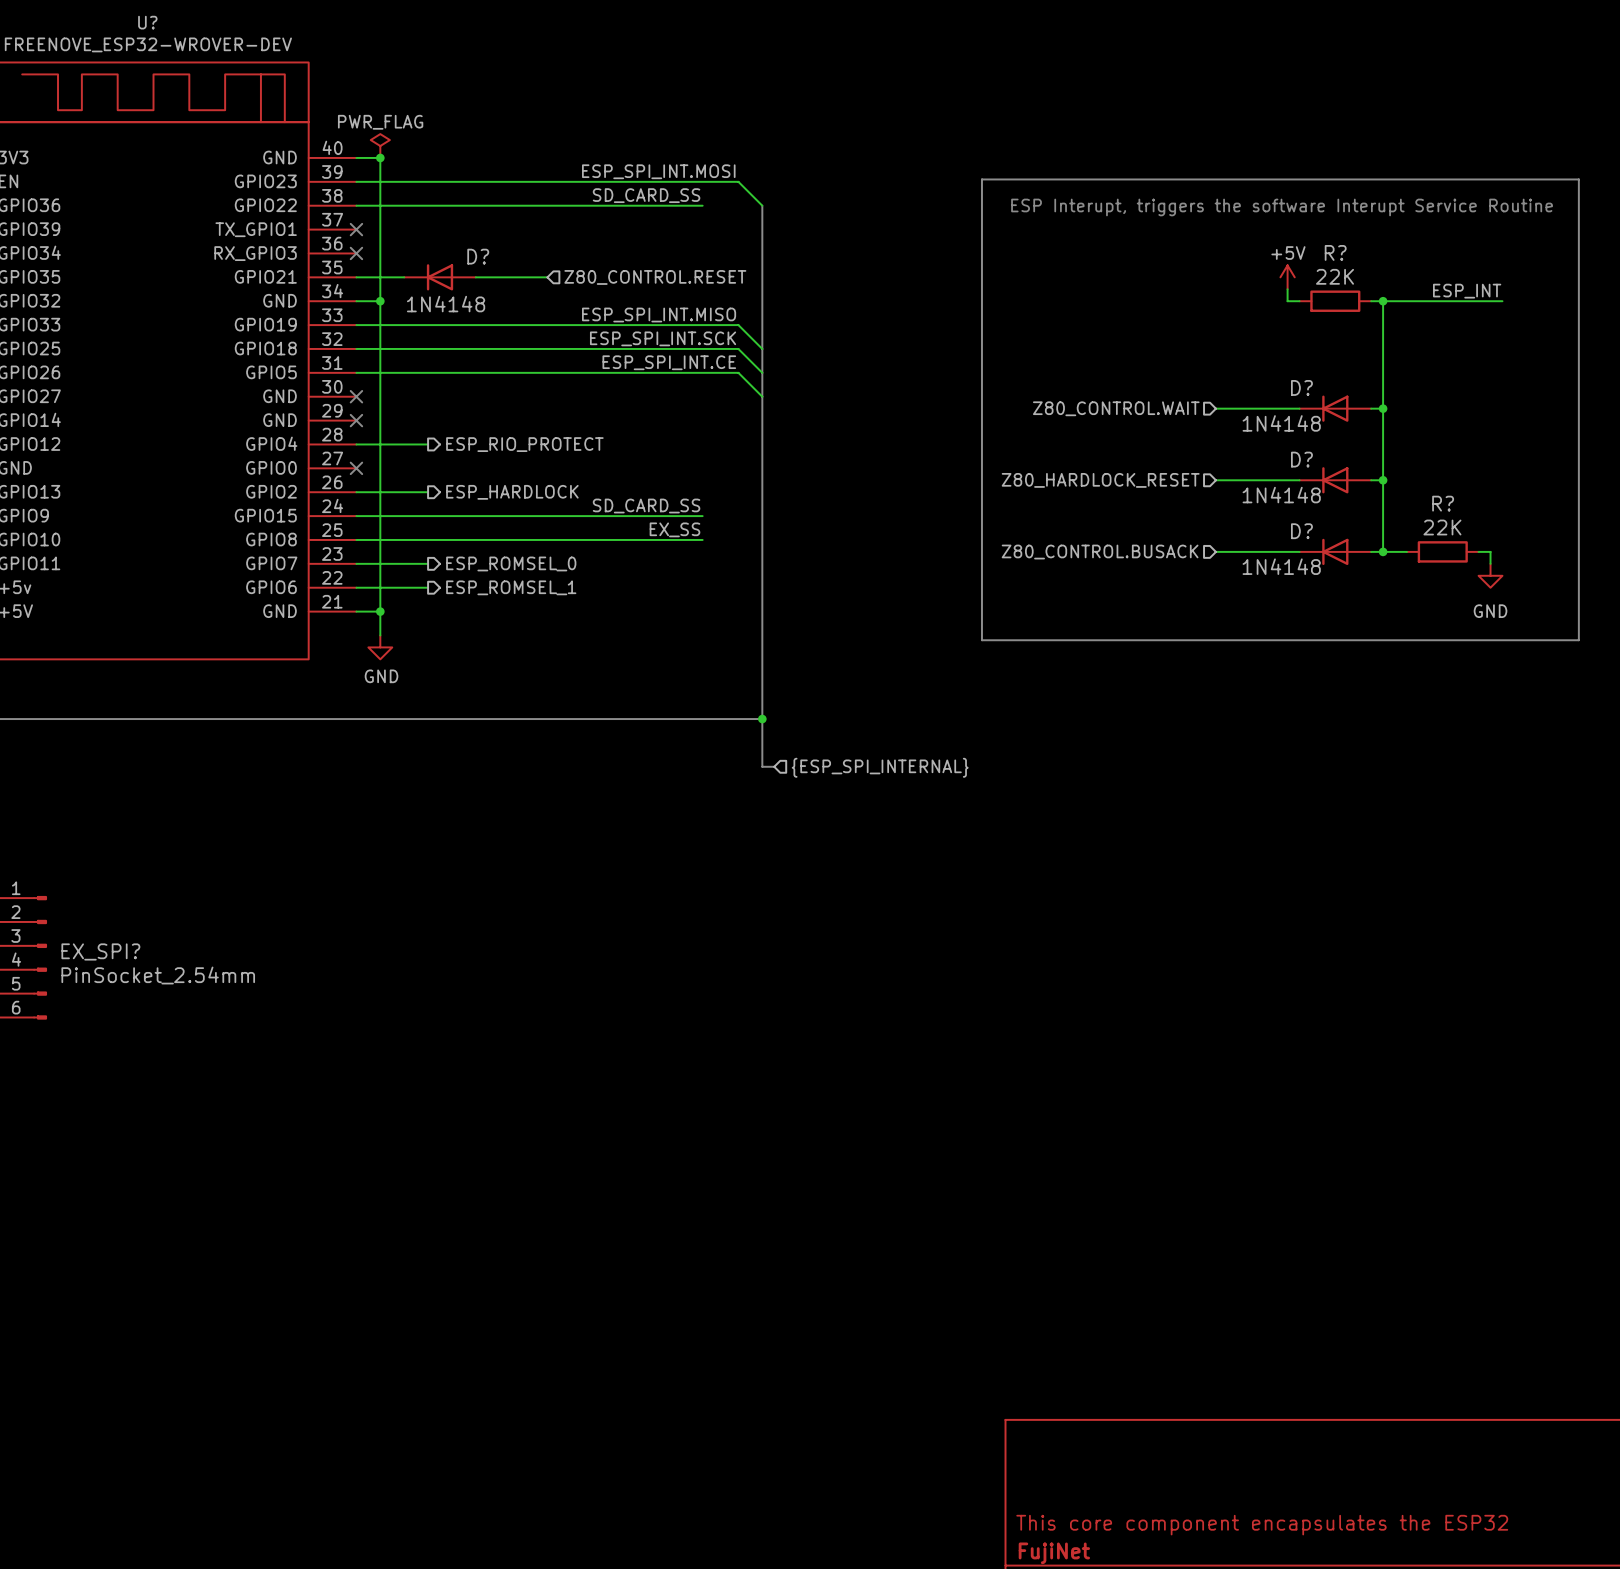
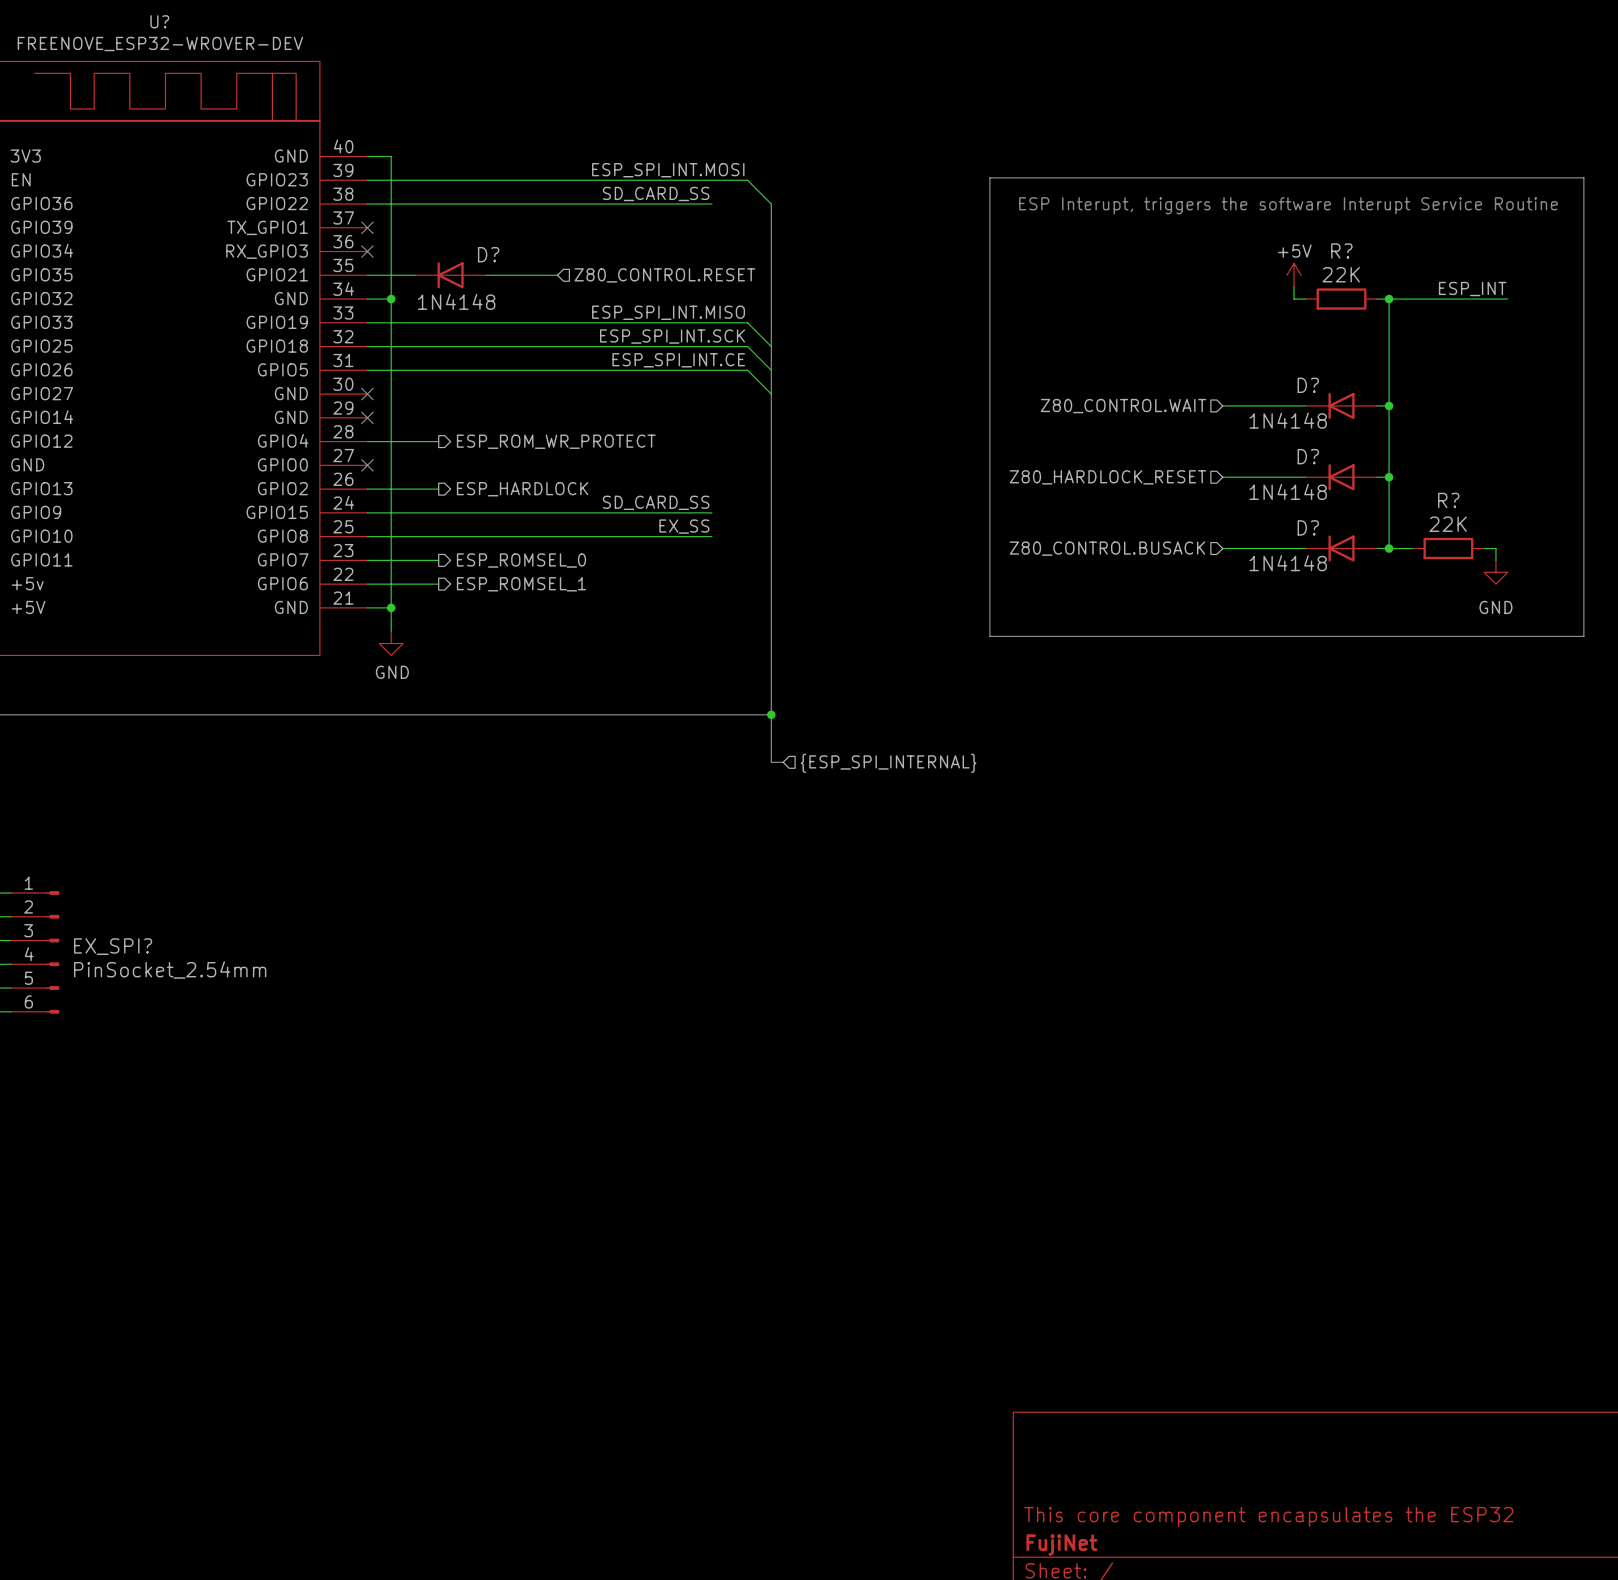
power symbol: PWR_FLAG (380, 146) -> none
junction: (380, 157) -> none
hierarchical label: ESP_RIO_PROTECT (524, 444) -> ESP_ROM_WR_PROTECT (556, 441)

